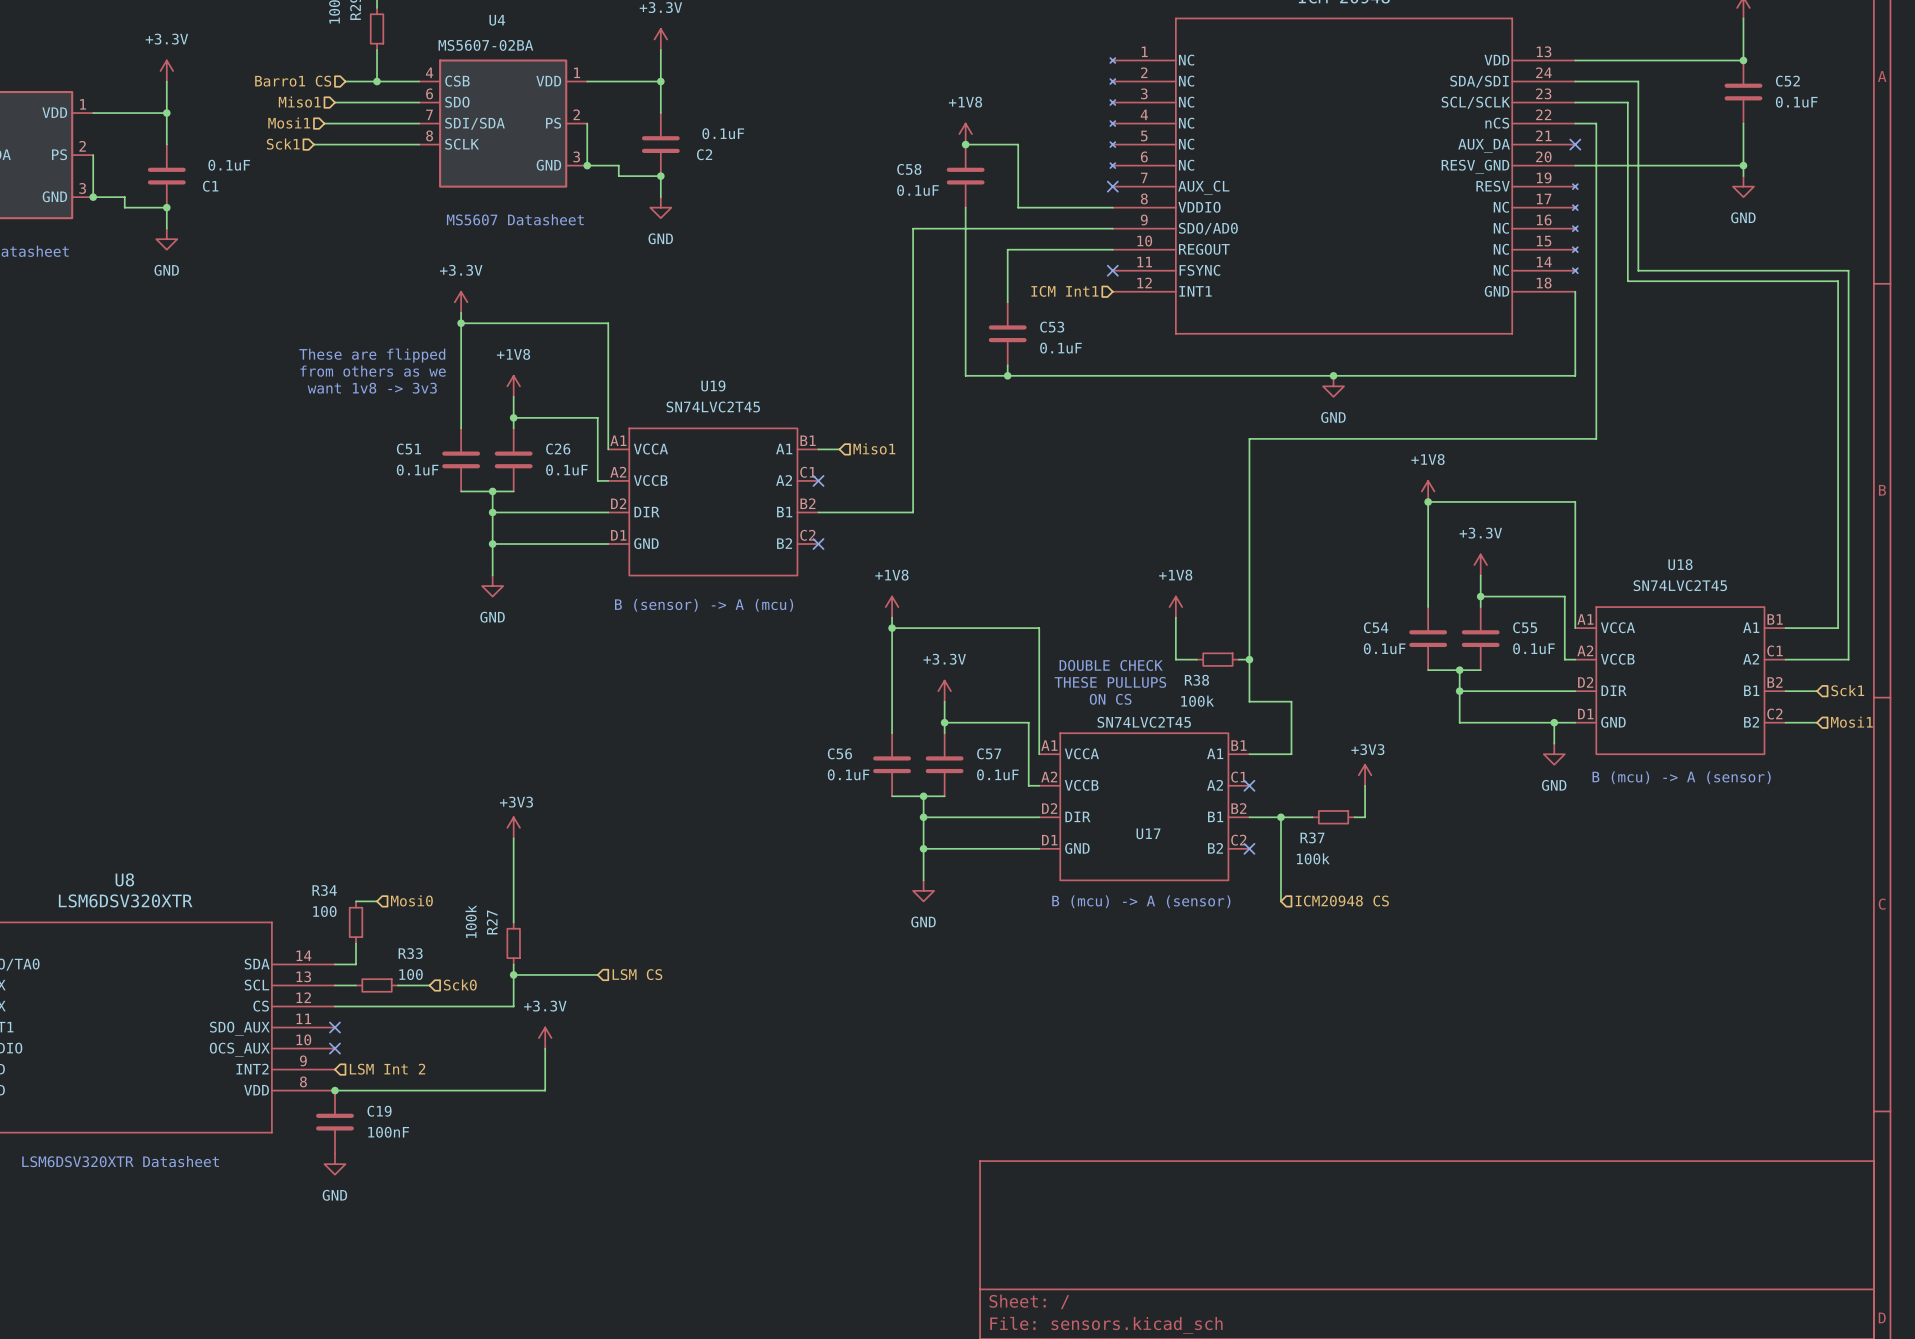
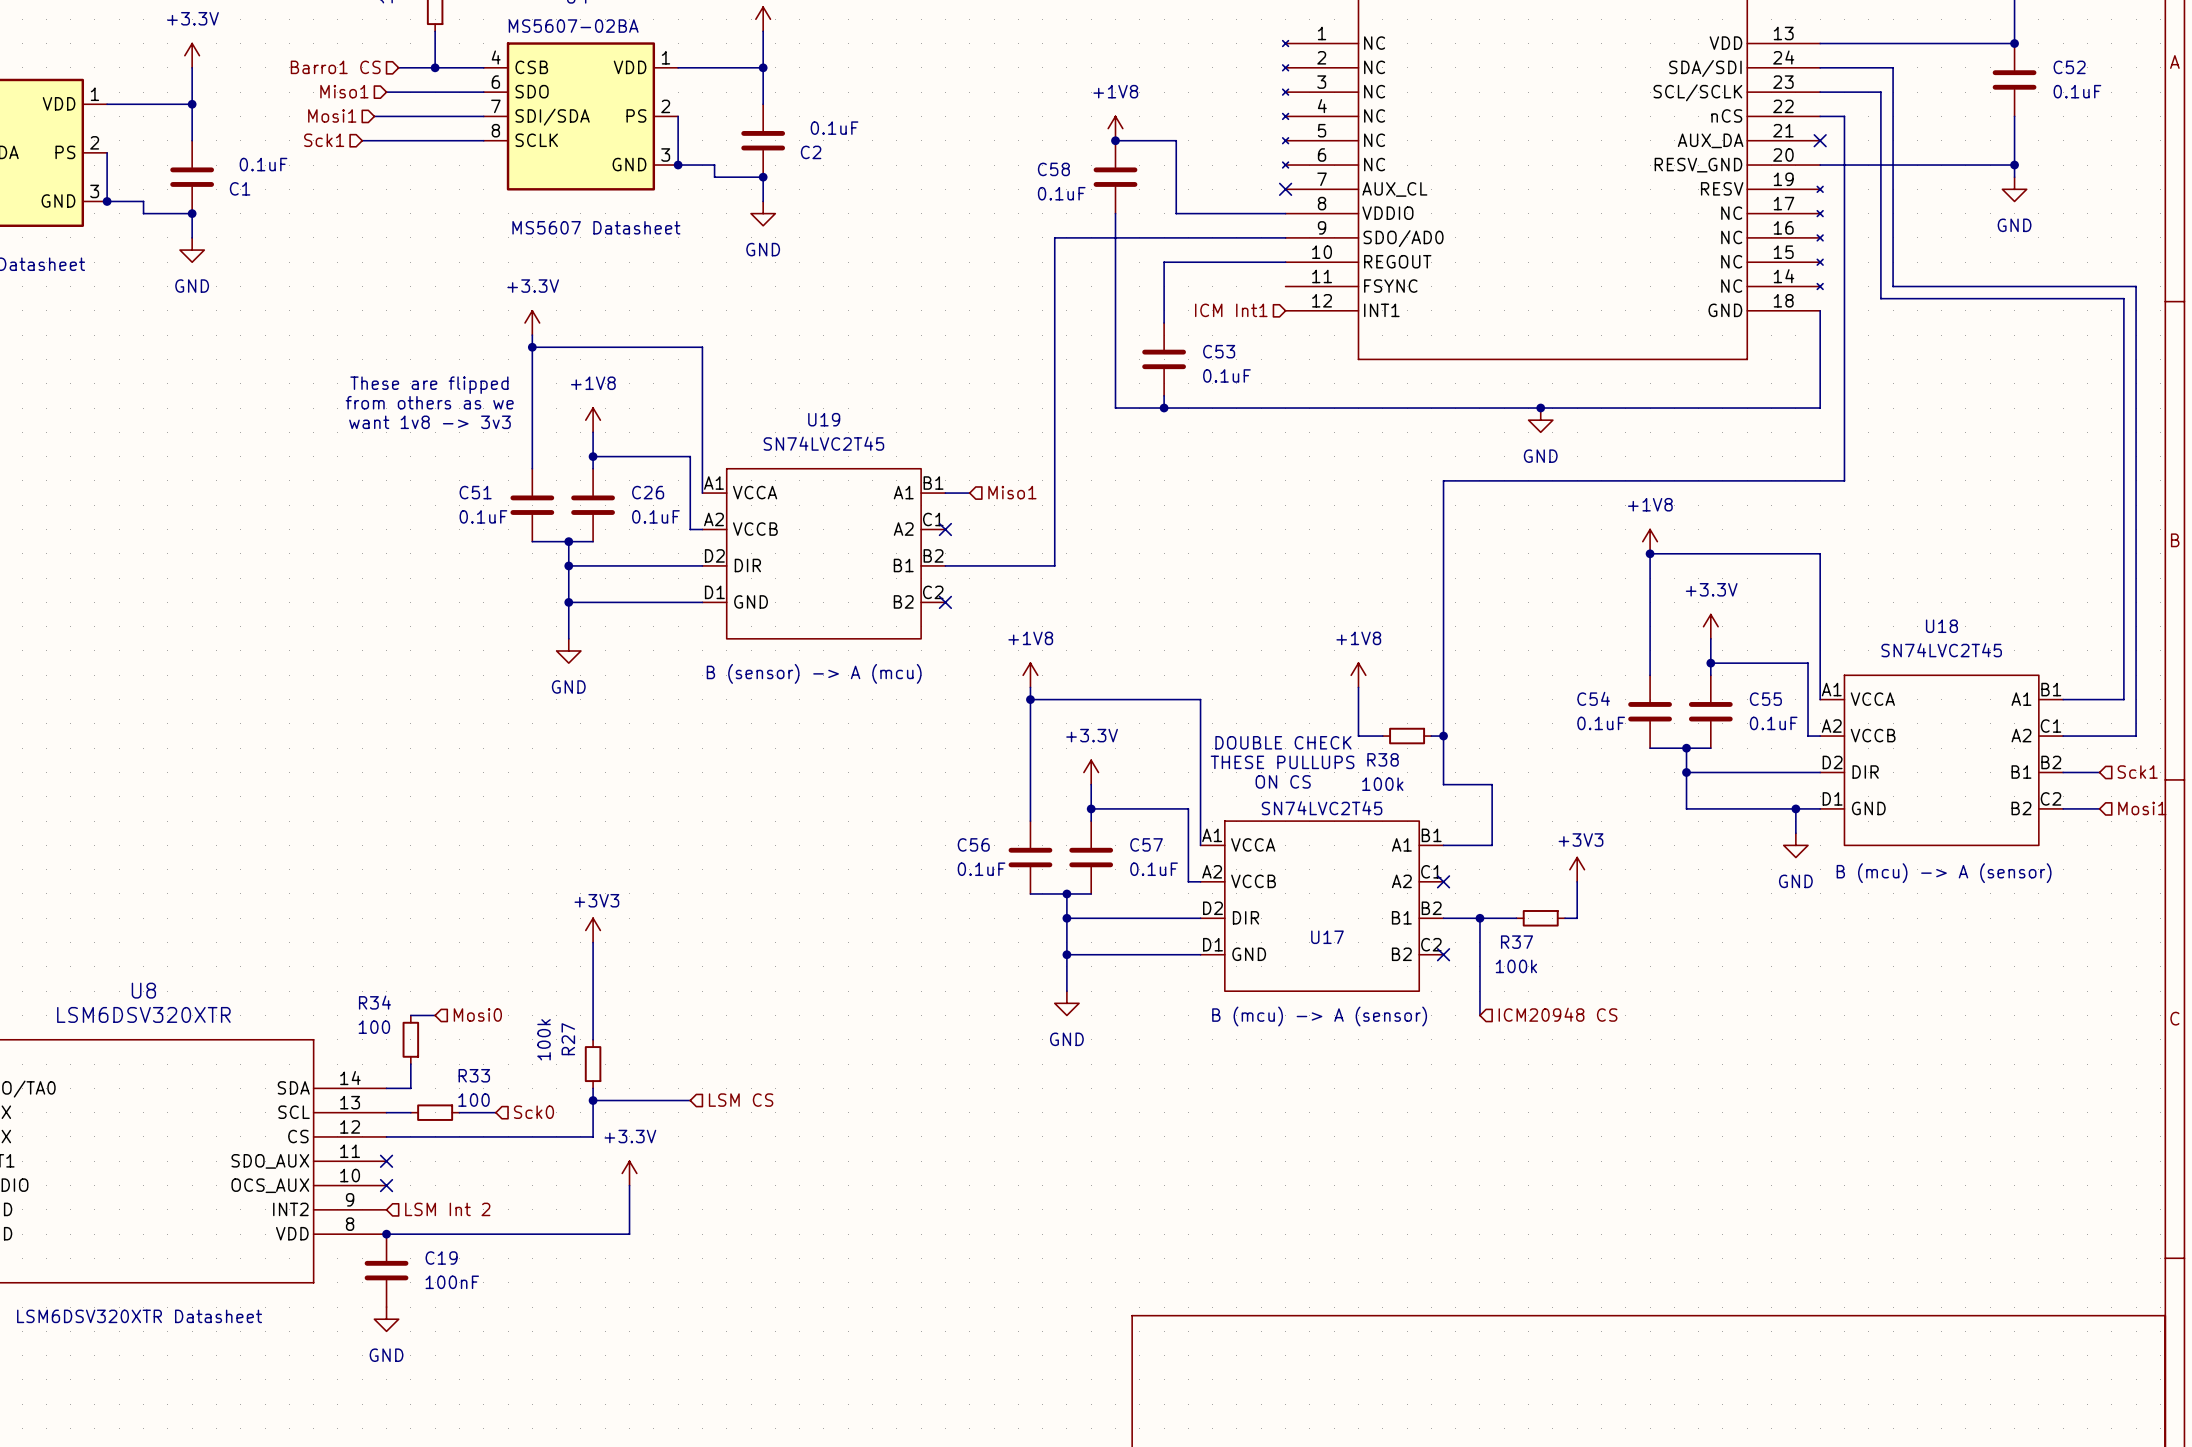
no-connect mark: (1112, 270) -> none

